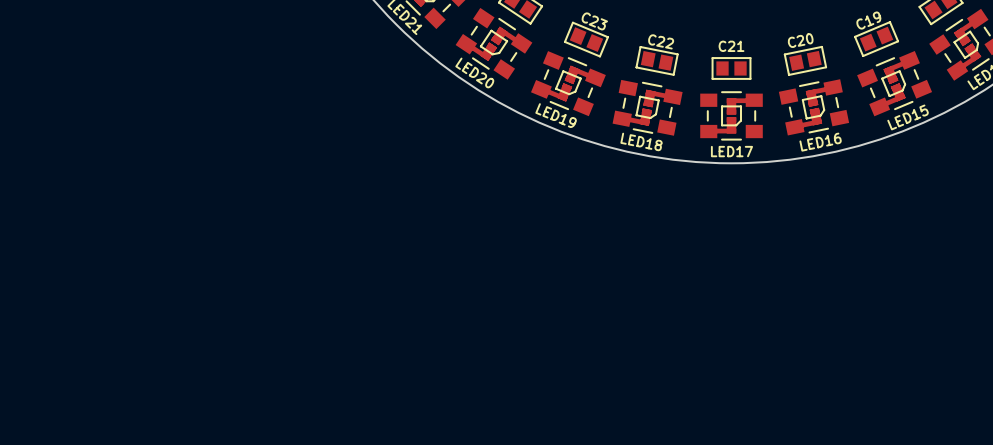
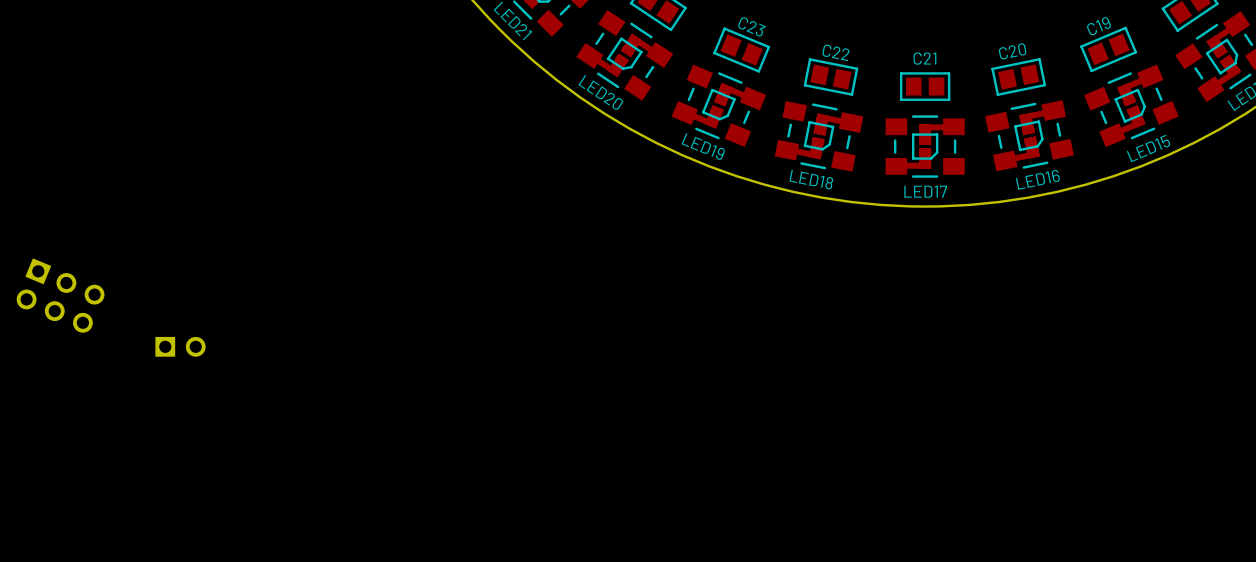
part: none -> (60, 295)
part: none -> (180, 346)

